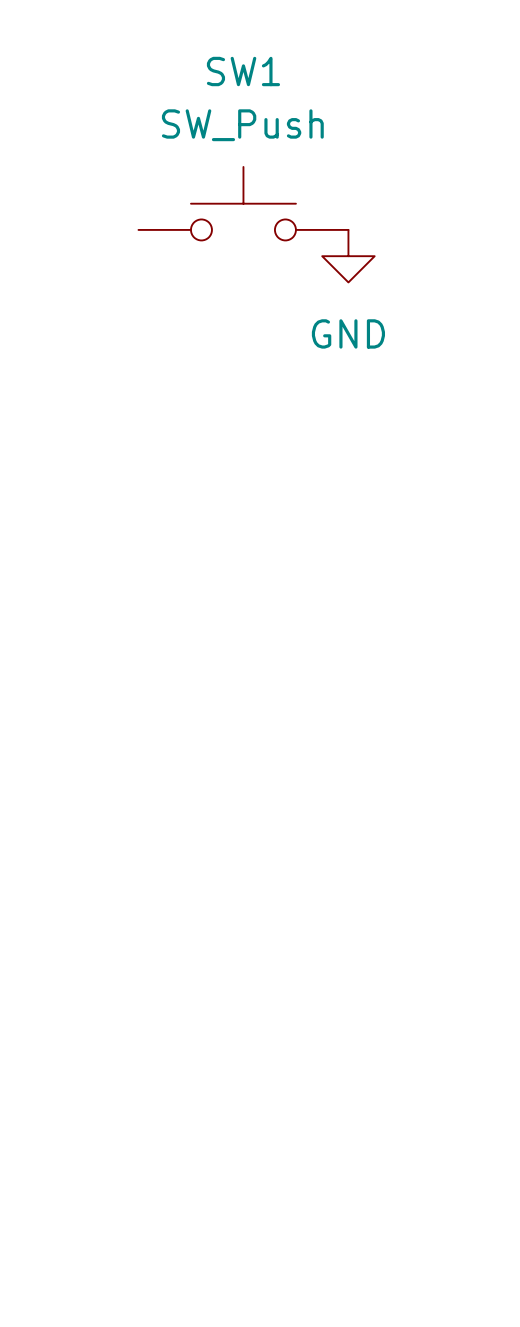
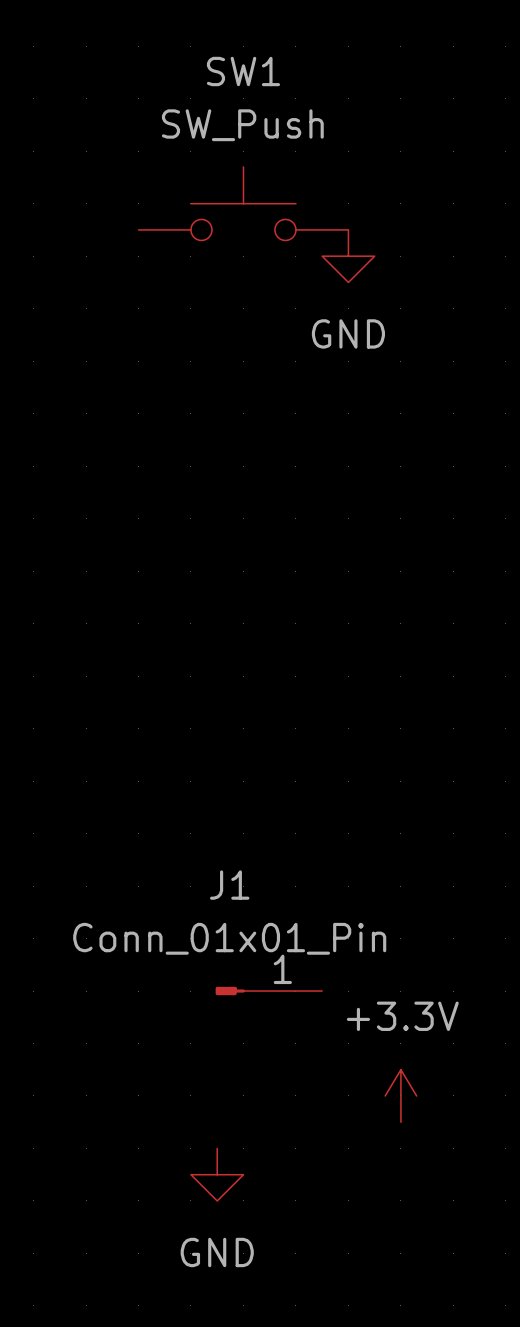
J1: none -> Conn_01x01_Pin (268, 991)
power symbol: none -> +3.3V (400, 1095)
power symbol: none -> GND (217, 1174)

